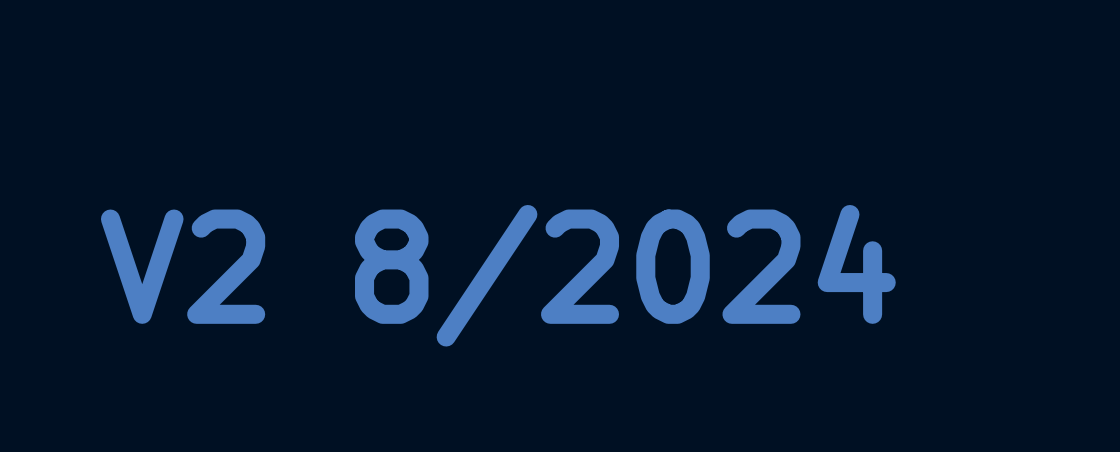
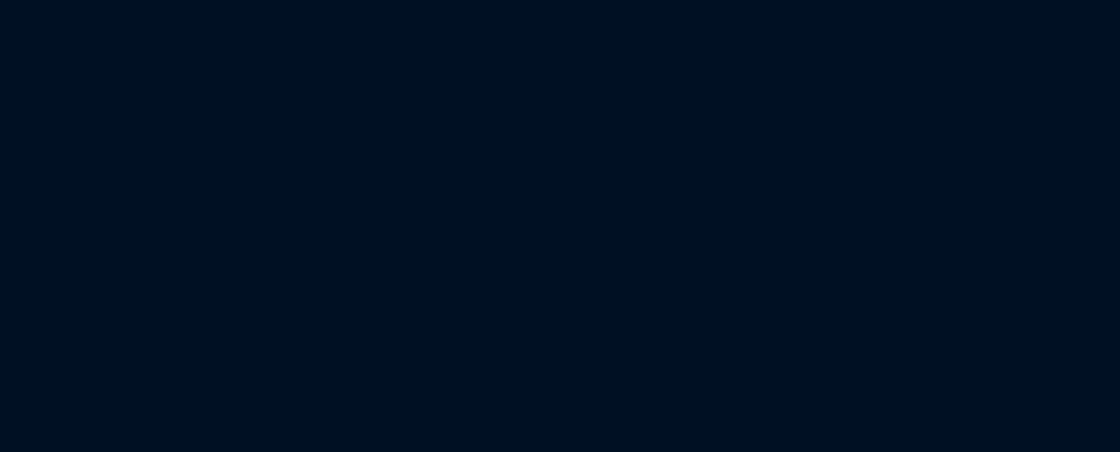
text: V2 8/2024 (498, 275) -> none

